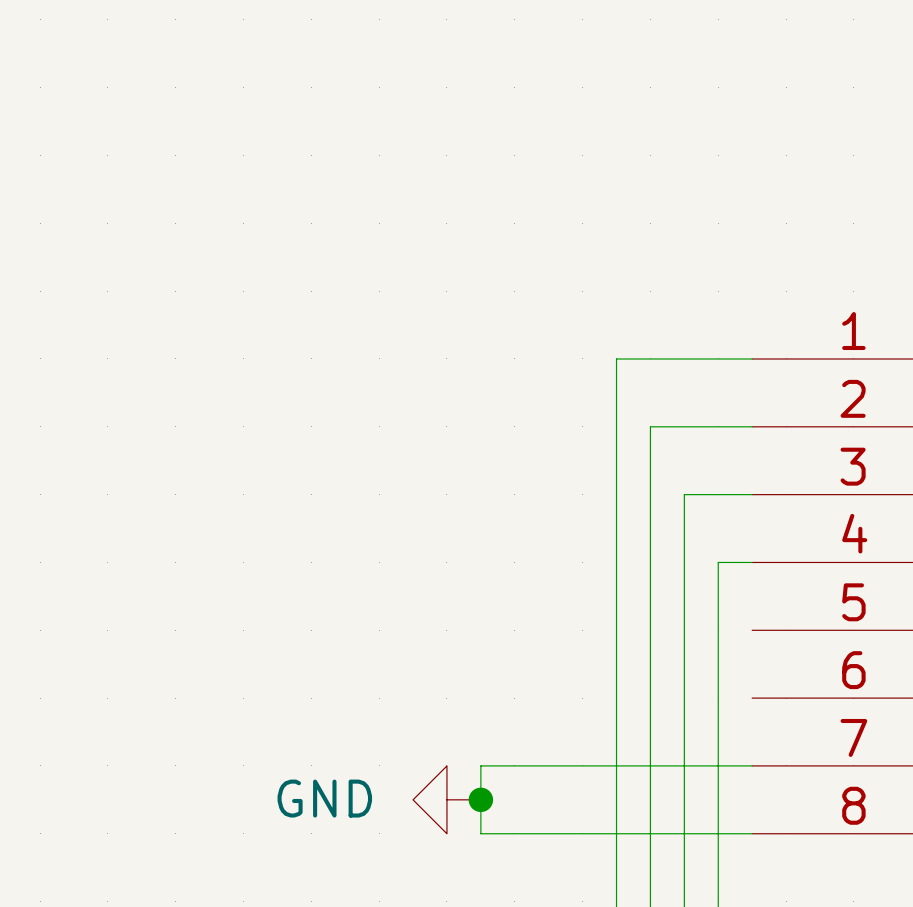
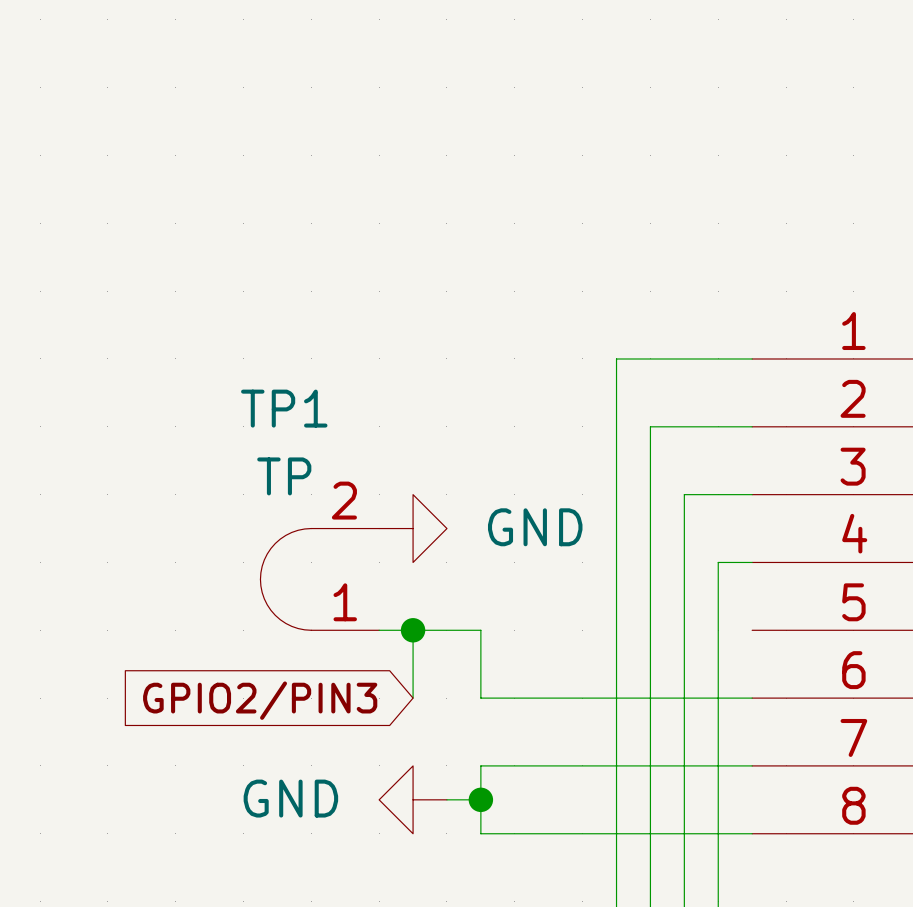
power symbol: none -> GND (413, 528)
TP1: none -> TP (319, 579)
wire: none -> (379, 630) (480, 630) (480, 698) (752, 698)
wire: none -> (413, 630) (413, 698)
junction: none -> (413, 630)
global label: none -> GPIO2/PIN3 (260, 700)
power symbol position: GND (446, 799) -> GND (413, 799)

